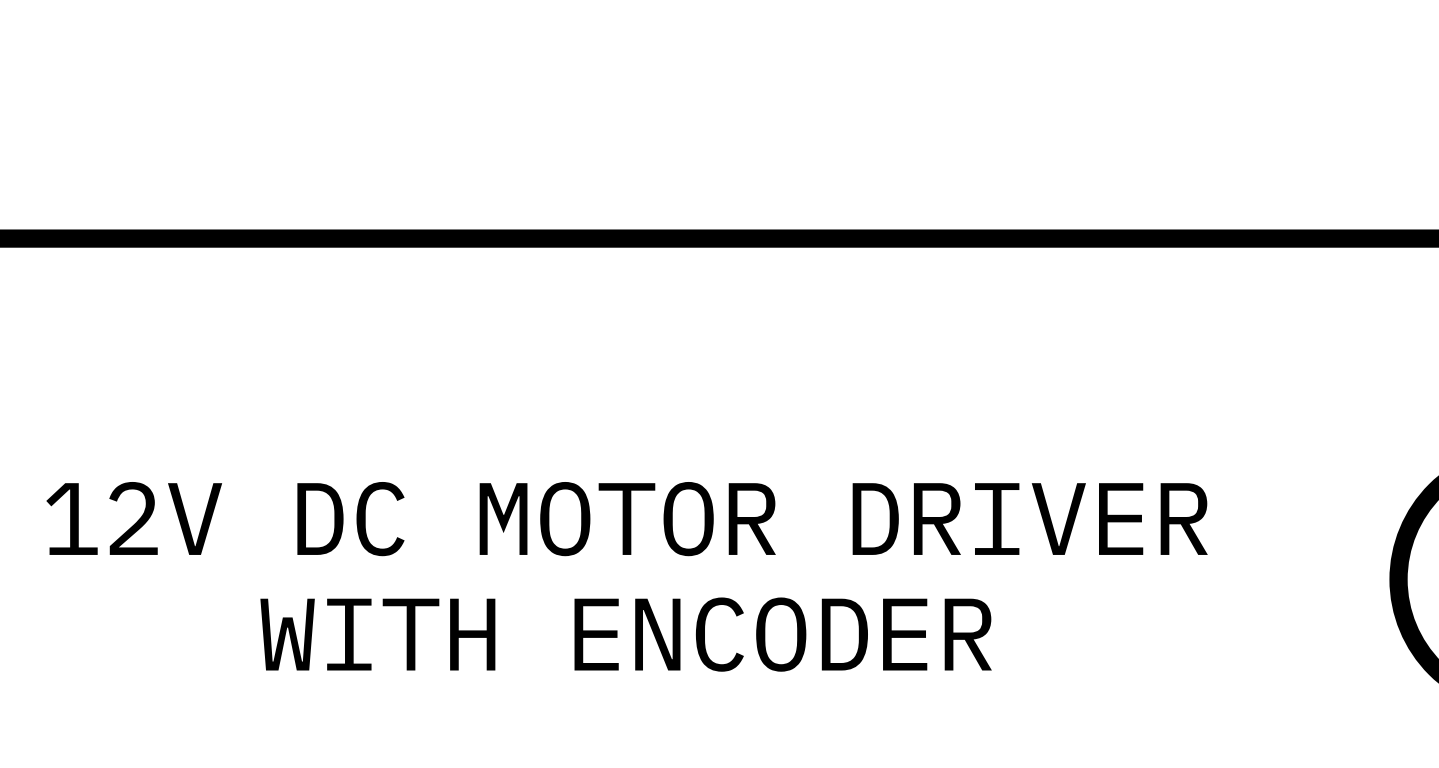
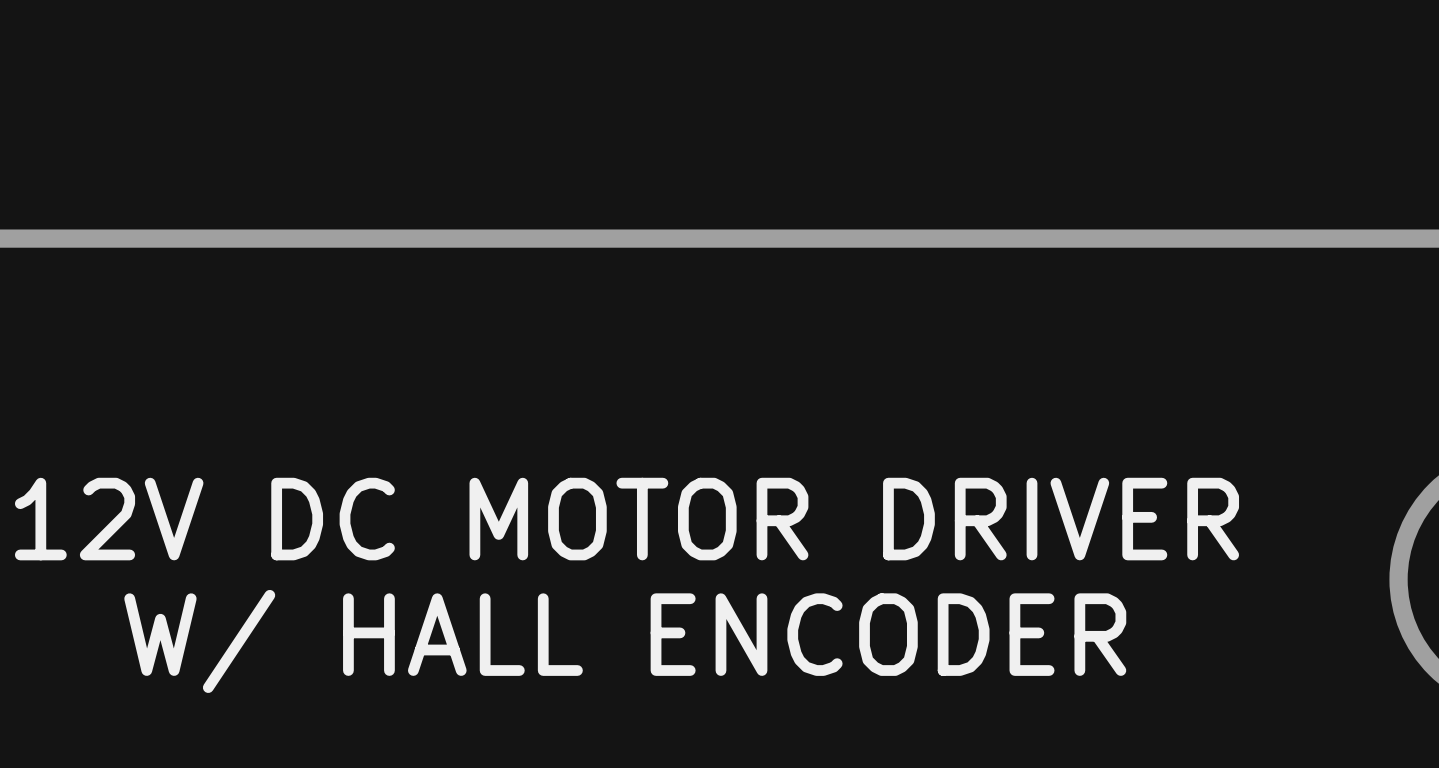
text: WITH ENCODER (626, 634) -> W/ HALL ENCODER (625, 641)

